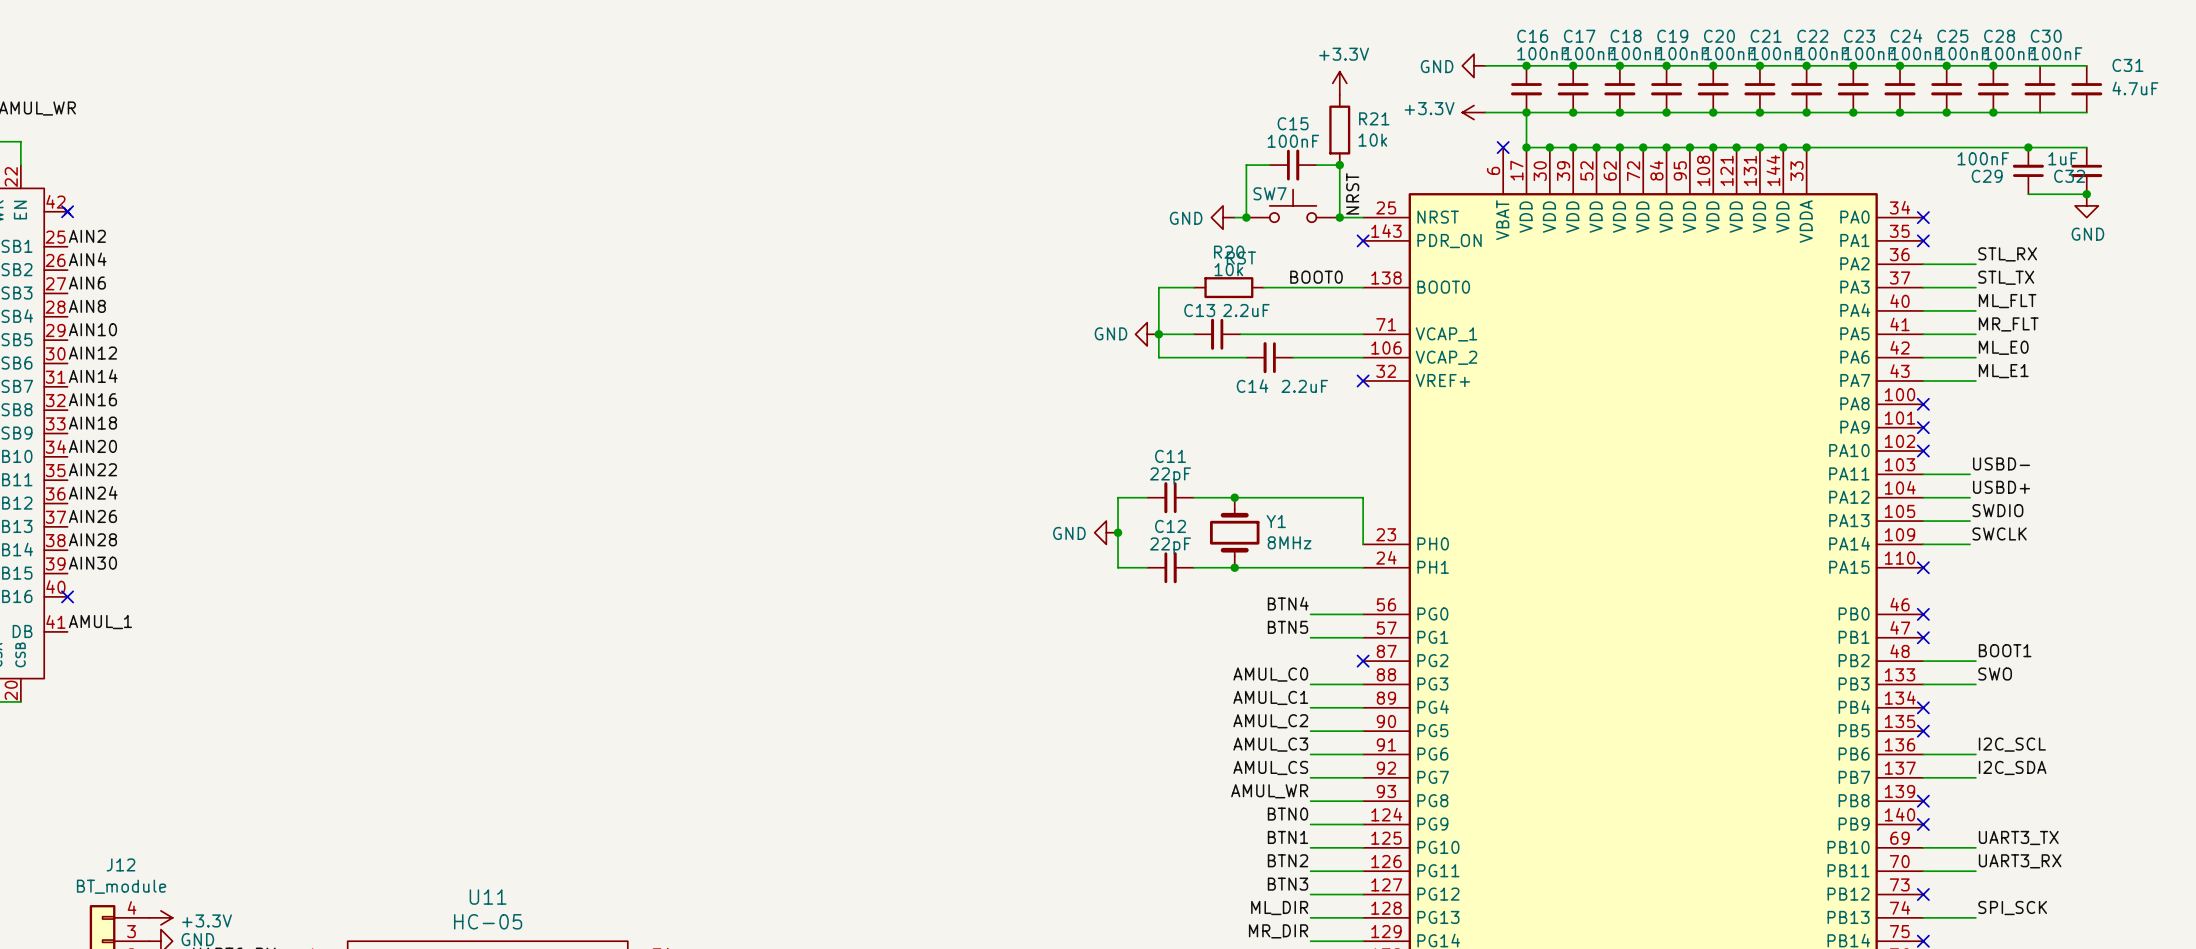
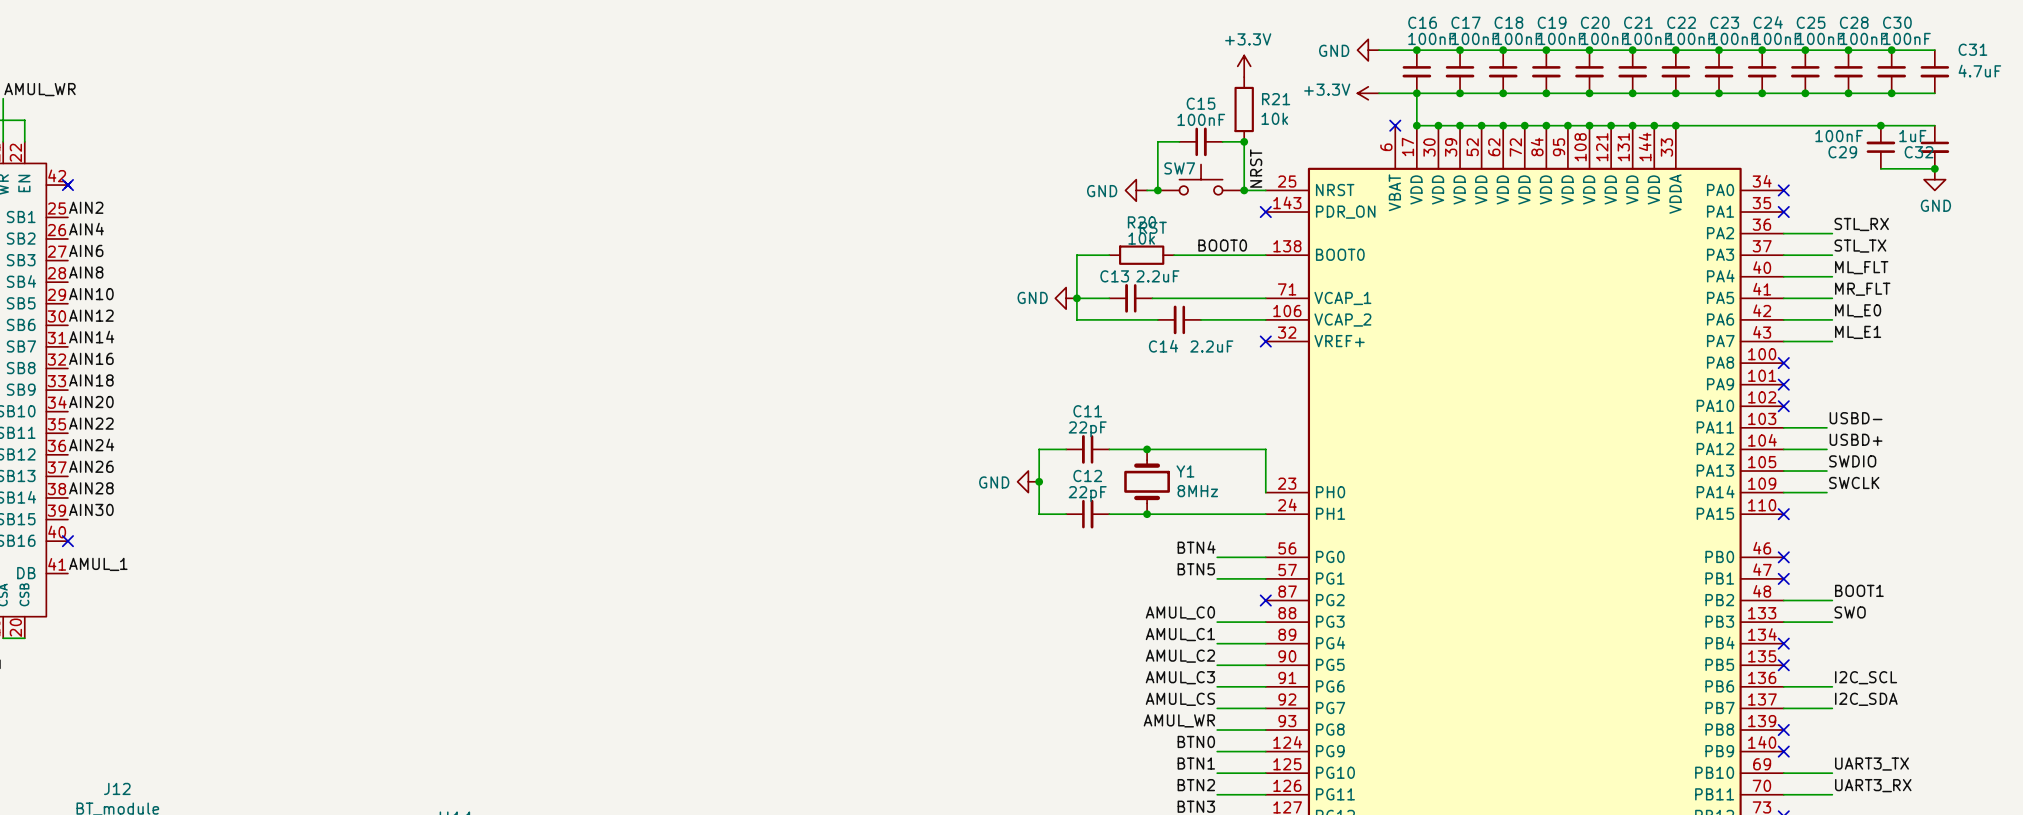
junction: none -> (1891, 50)
junction: none -> (1891, 93)

